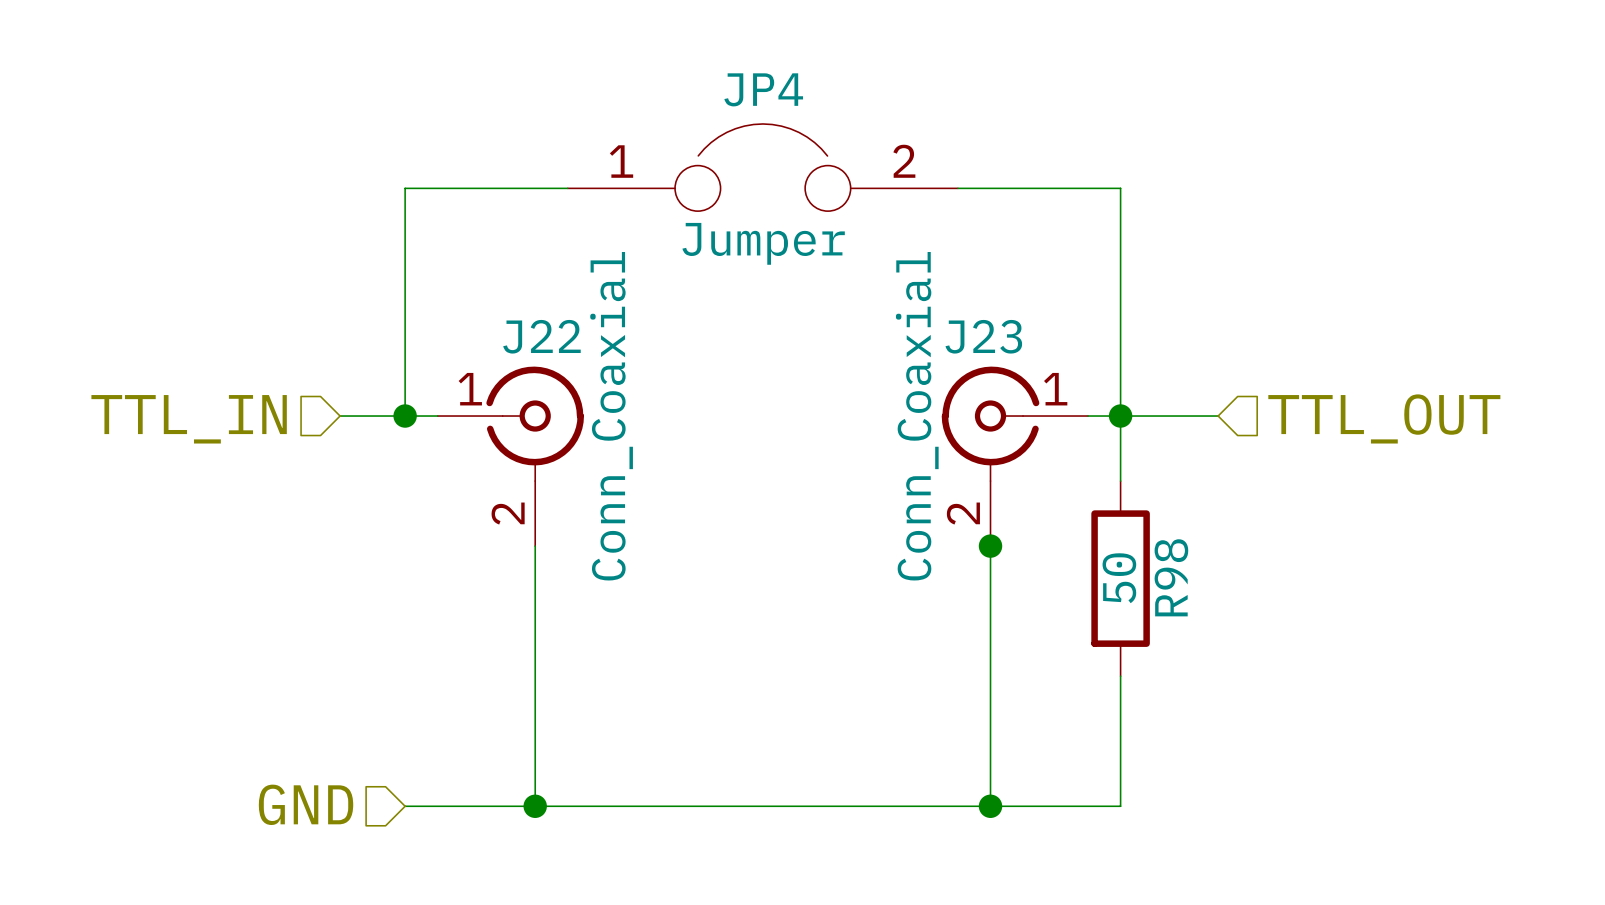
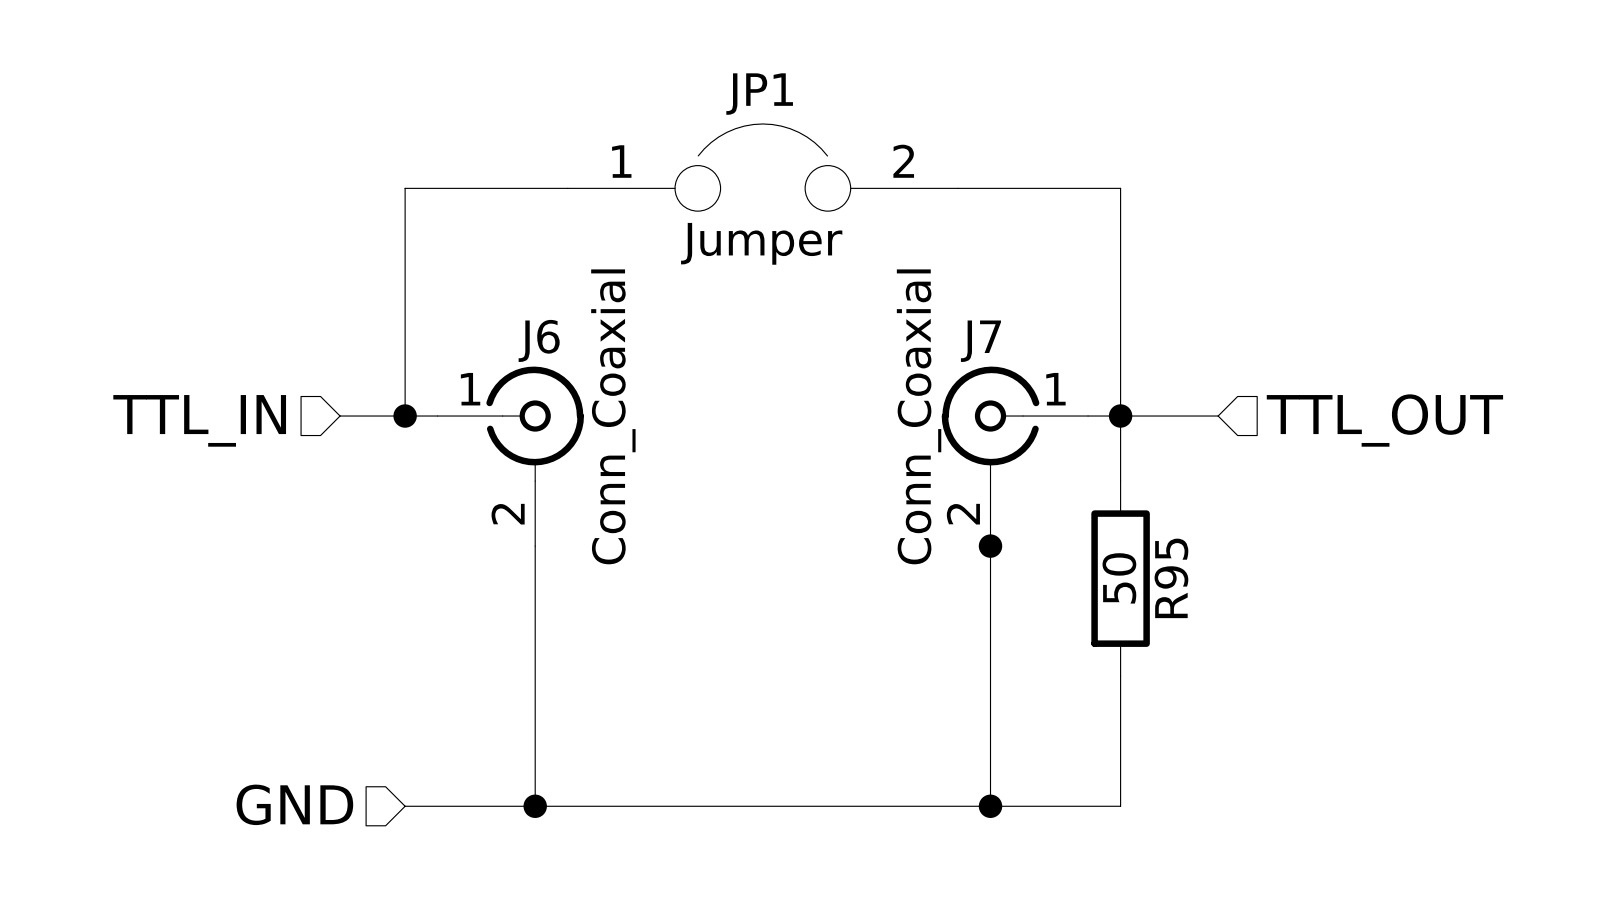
JP4 name: JP4 (763, 89) -> JP1 (759, 94)
J22 name: J22 (541, 336) -> J6 (539, 340)
J23 name: J23 (983, 336) -> J7 (980, 341)
R98 name: R98 (1171, 577) -> R95 (1171, 578)

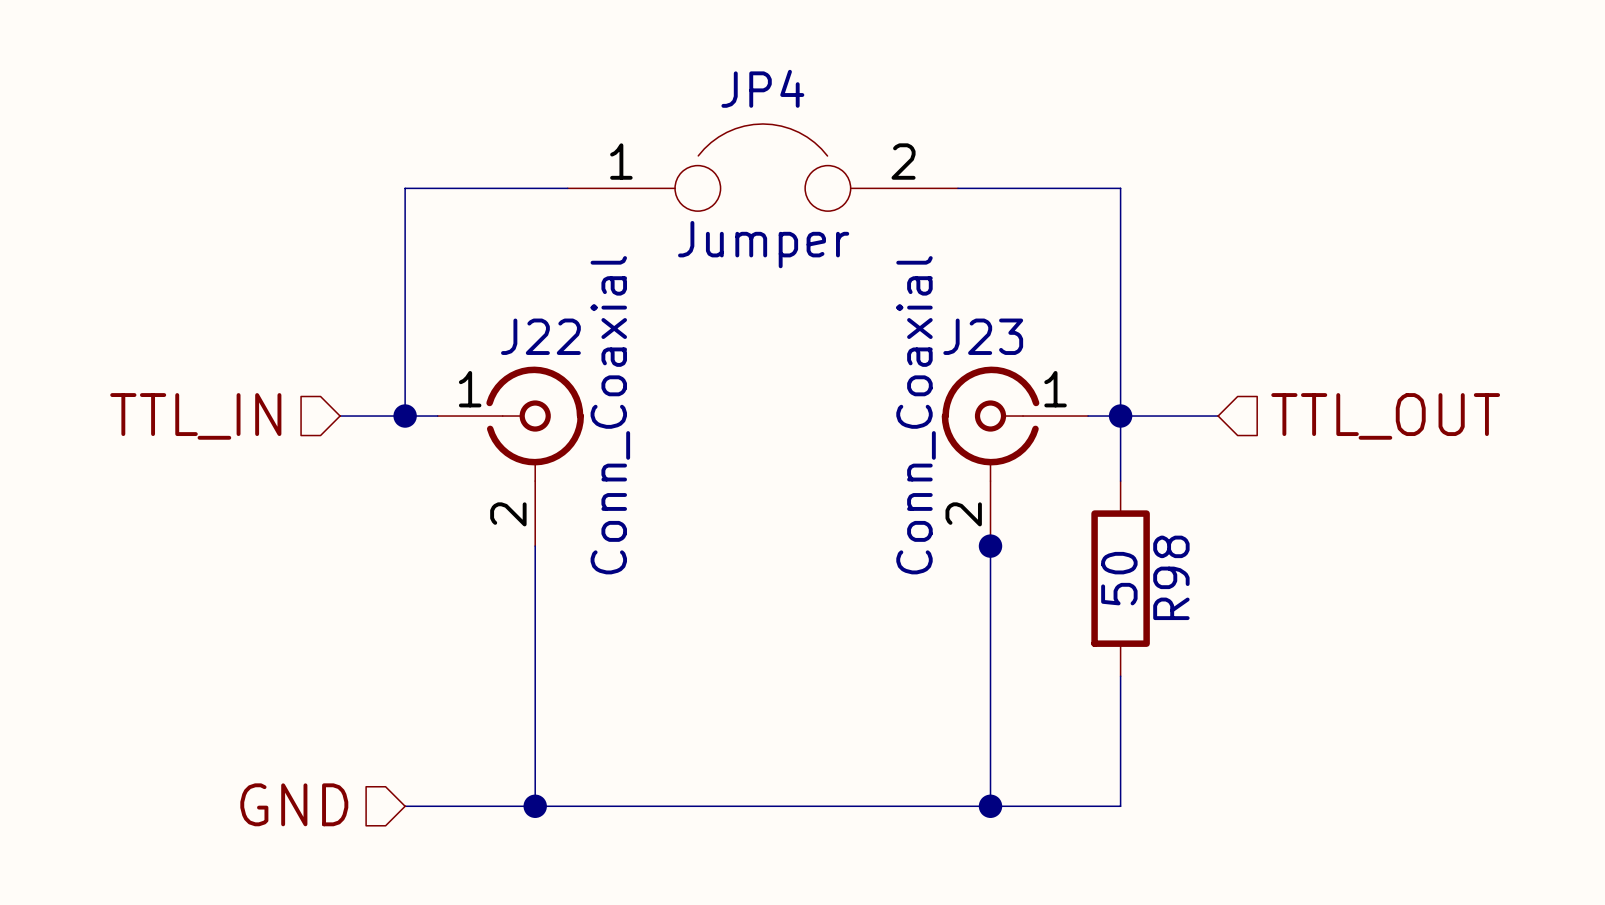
JP1 name: JP1 (759, 94) -> JP4 (762, 88)
J6 name: J6 (539, 340) -> J22 (540, 336)
J7 name: J7 (980, 341) -> J23 (983, 336)
R95 name: R95 (1171, 578) -> R98 (1171, 577)

